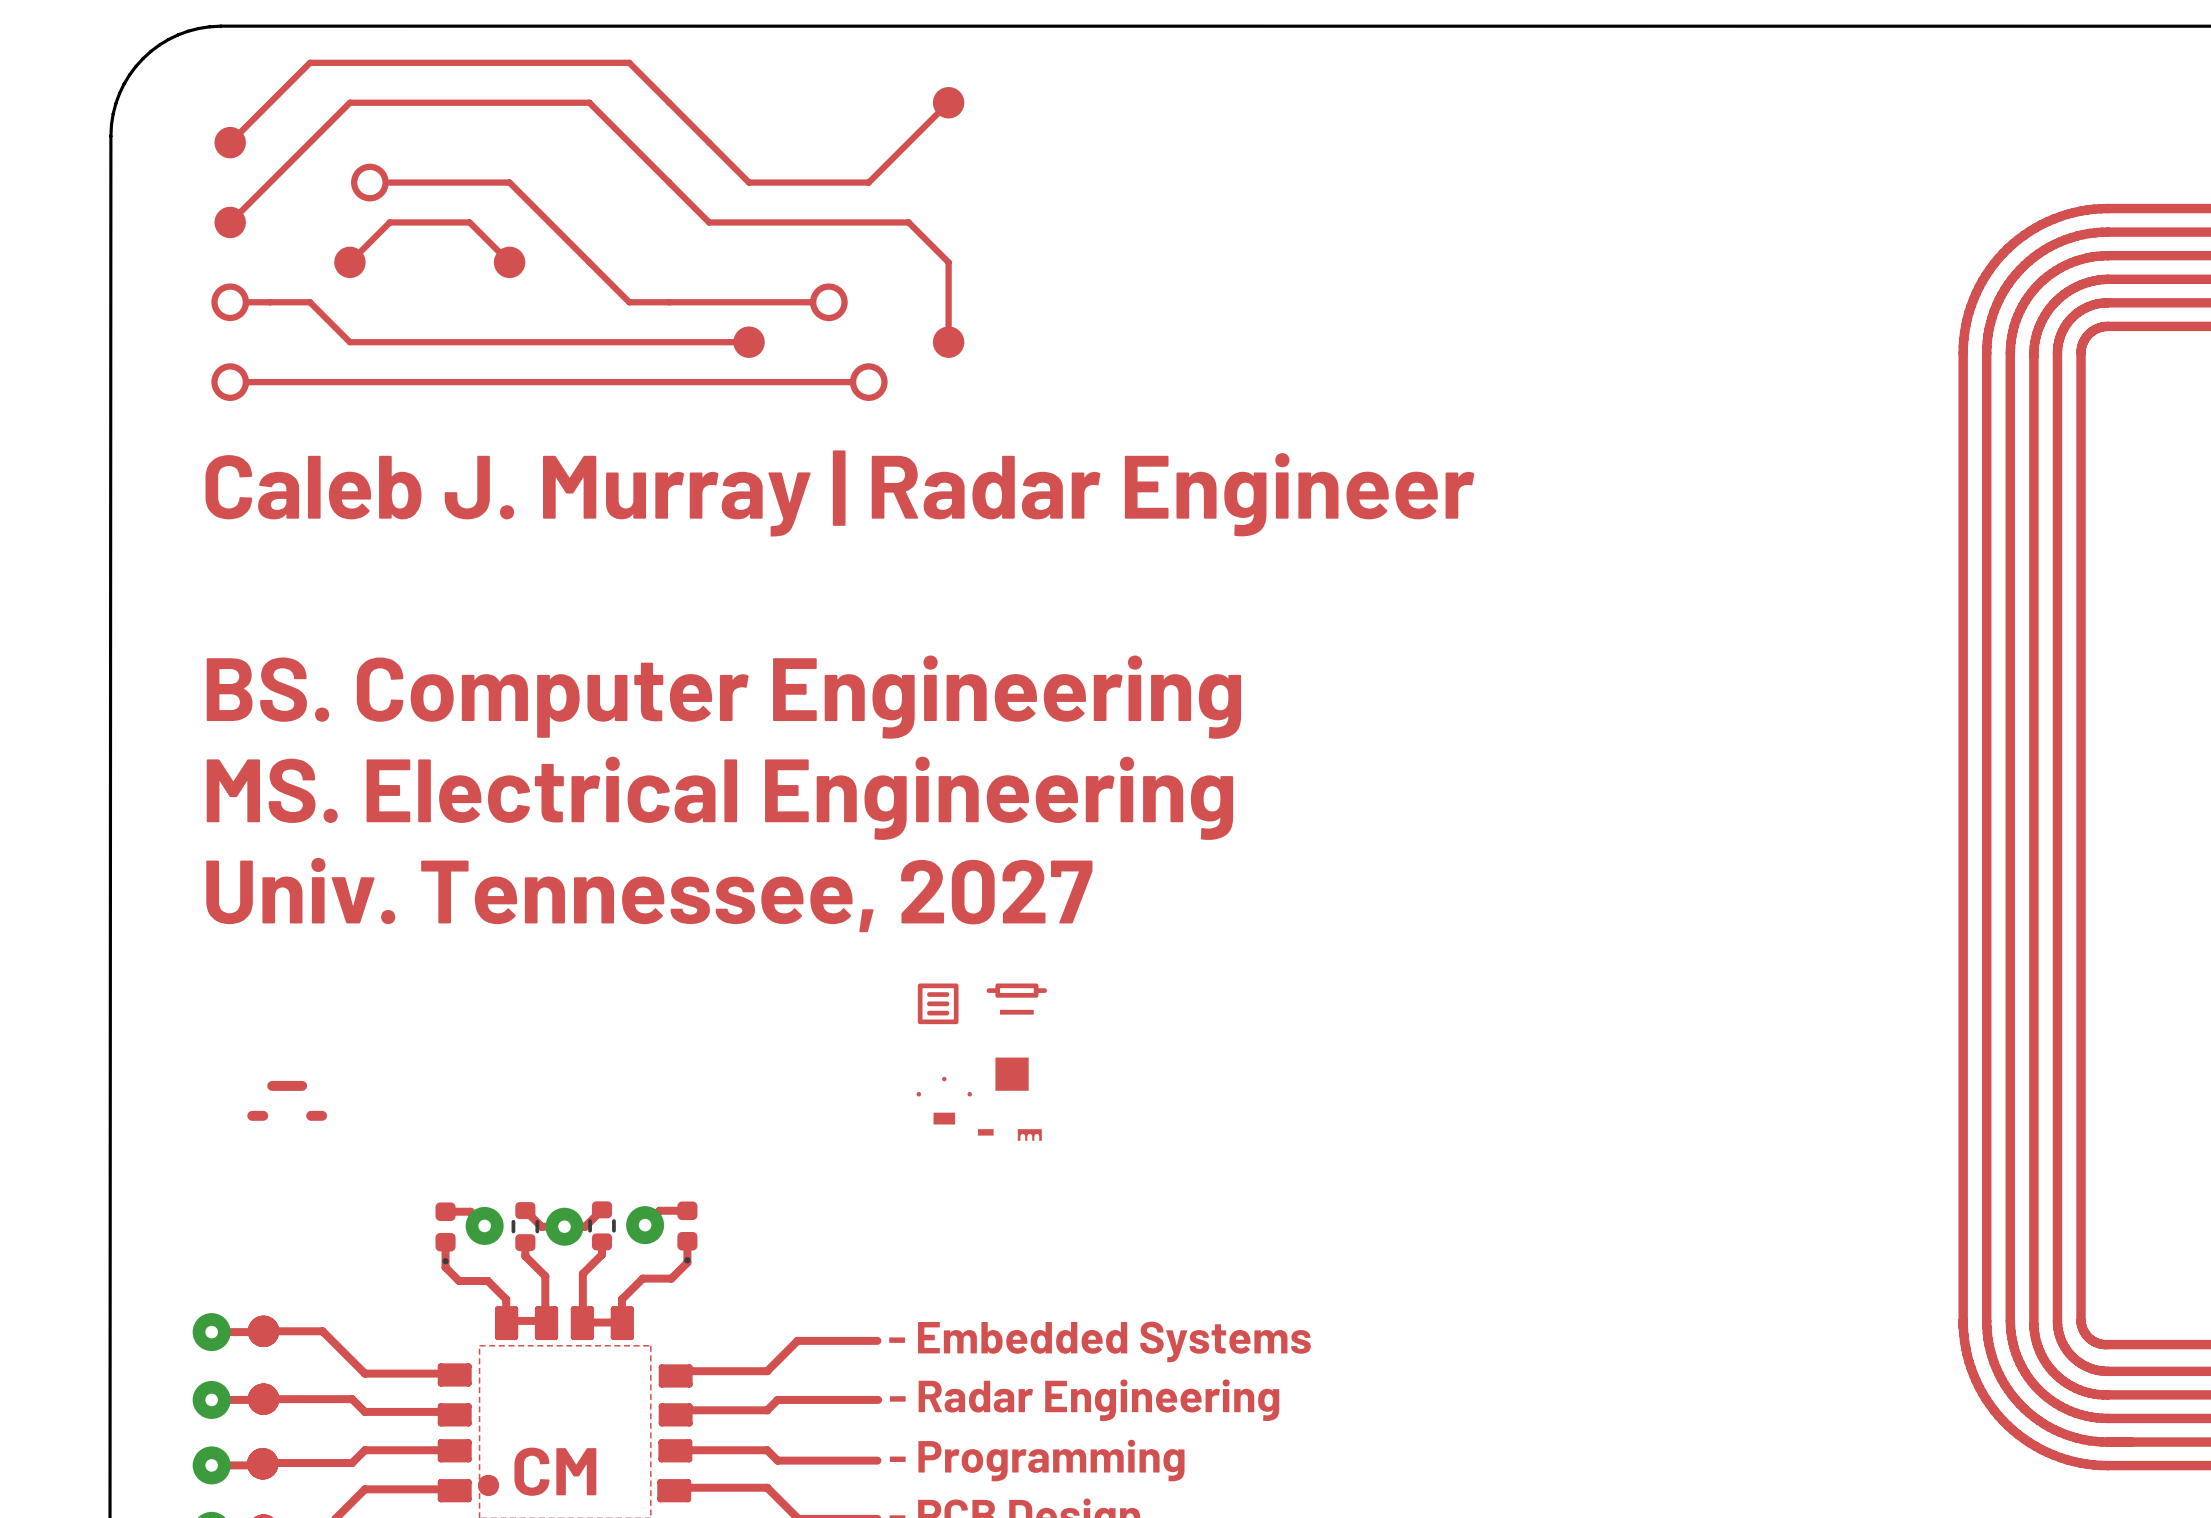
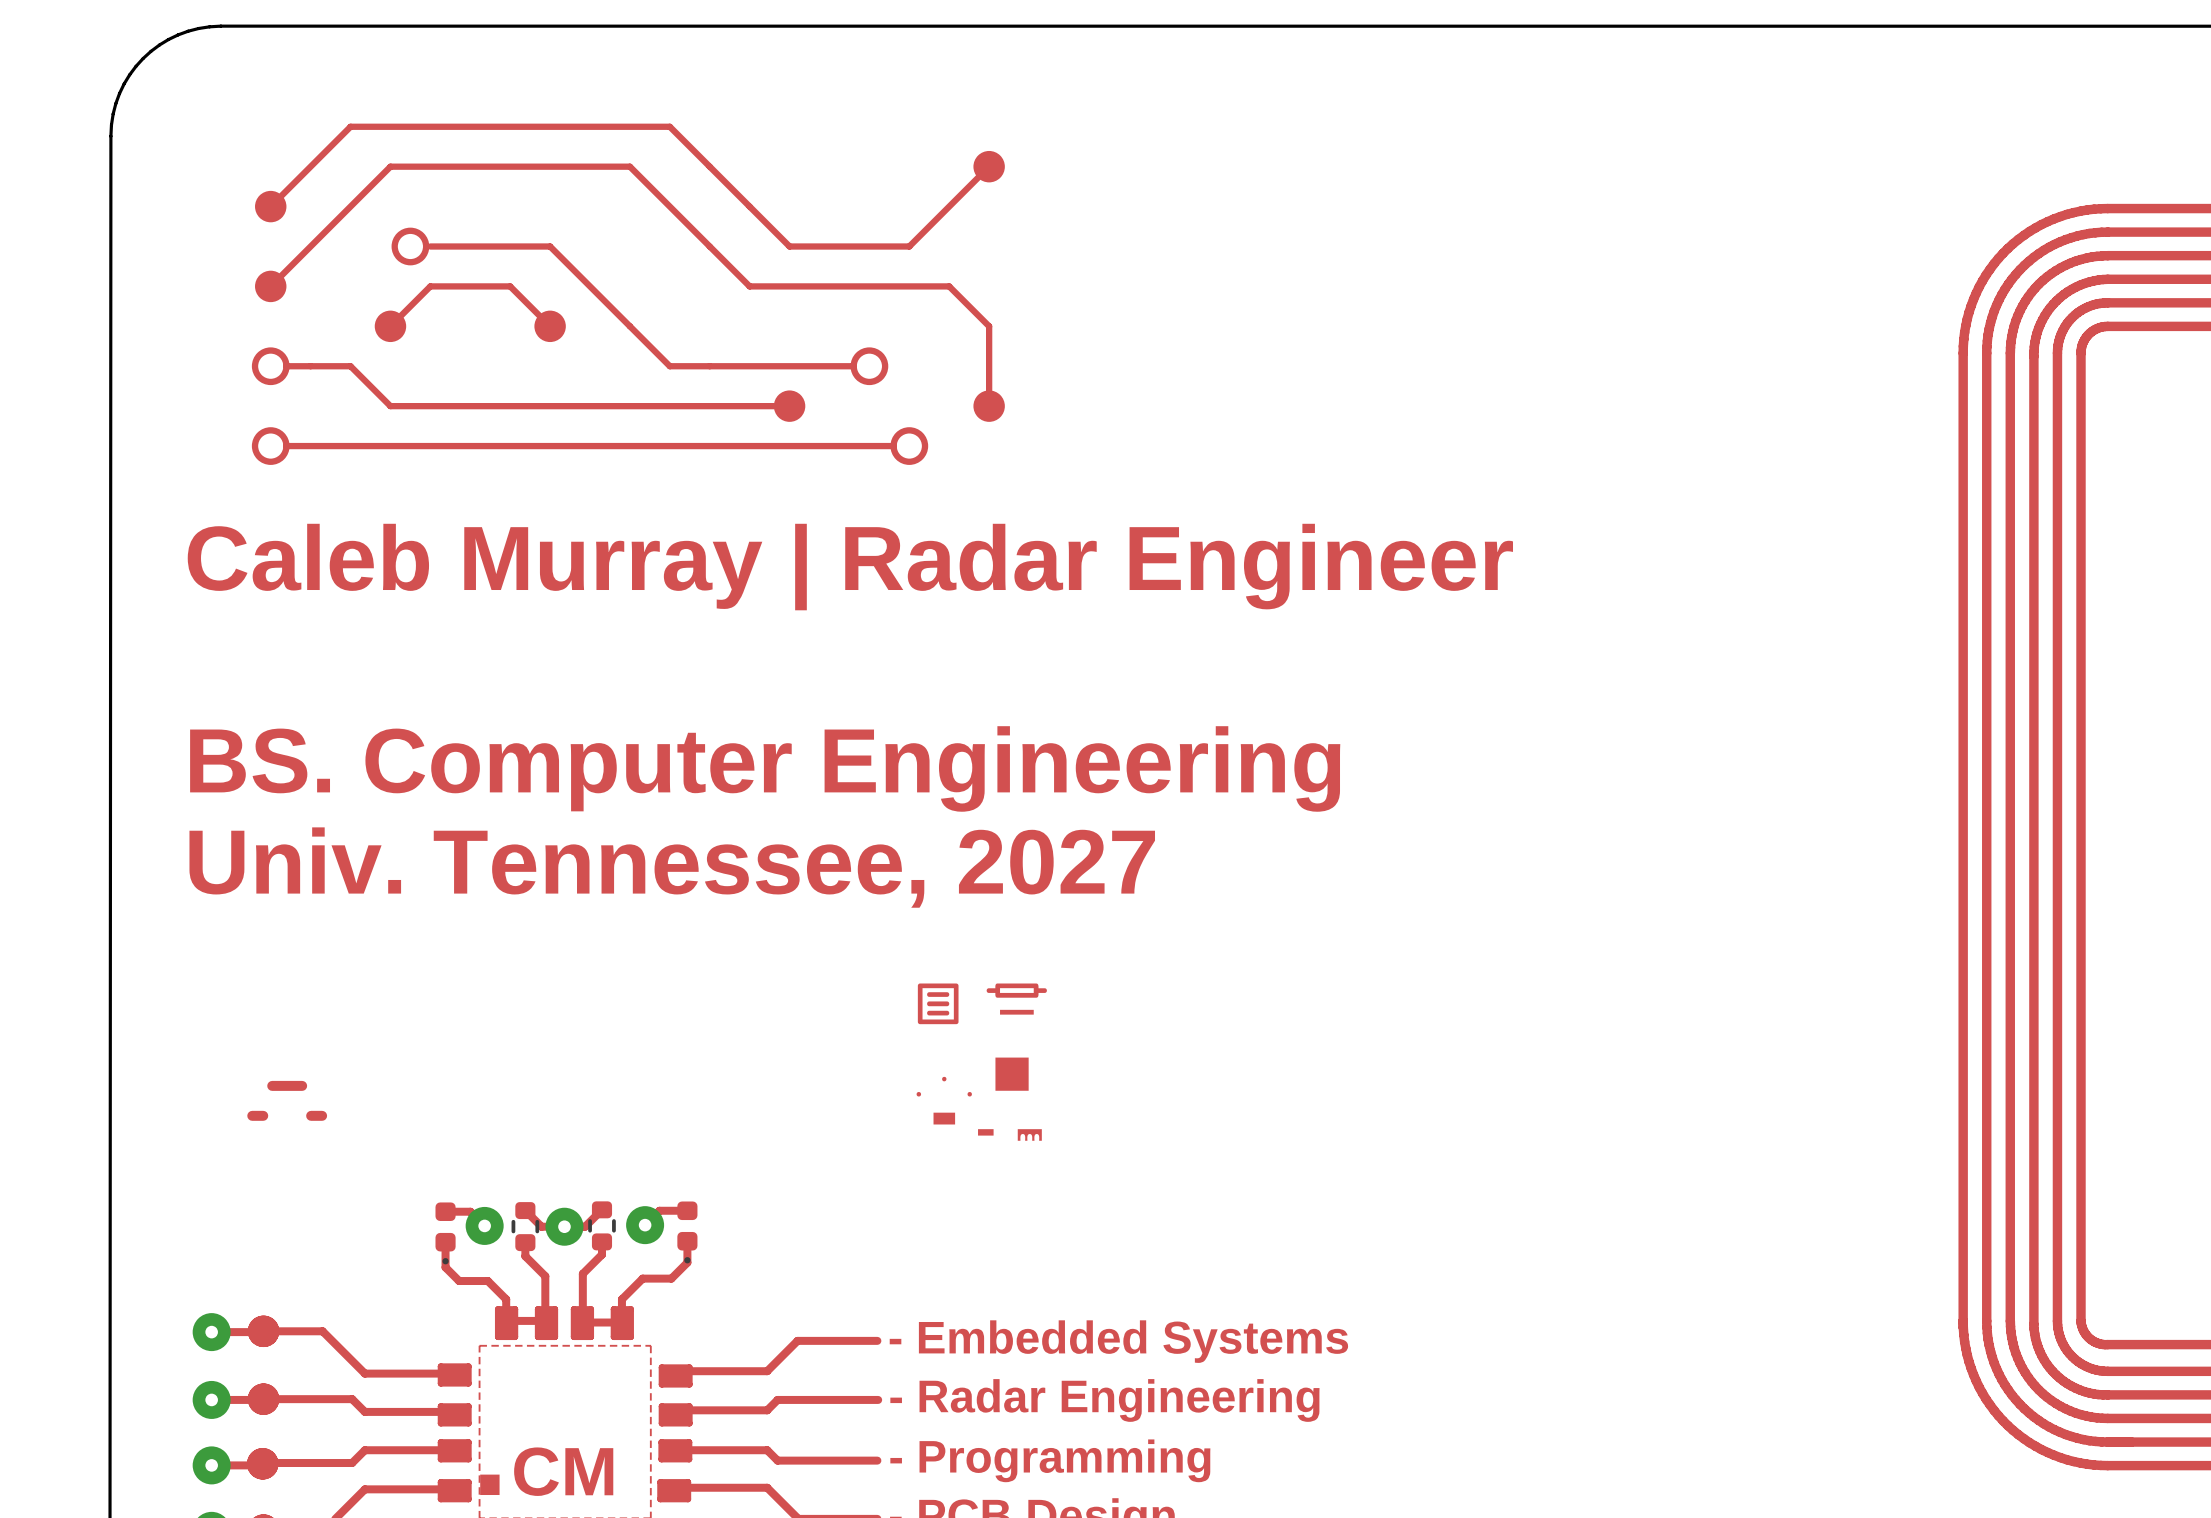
part position: (587, 230) -> (628, 294)
text: Caleb J. Murray | Radar Engineer (839, 493) -> Caleb Murray | Radar Engineer (850, 567)
text position: BS. Computer Engineering (723, 697) -> BS. Computer Engineering (765, 768)
text: MS. Electrical Engineering (719, 798) -> none
text position: Univ. Tennessee, 2027 (649, 895) -> Univ. Tennessee, 2027 (672, 867)

